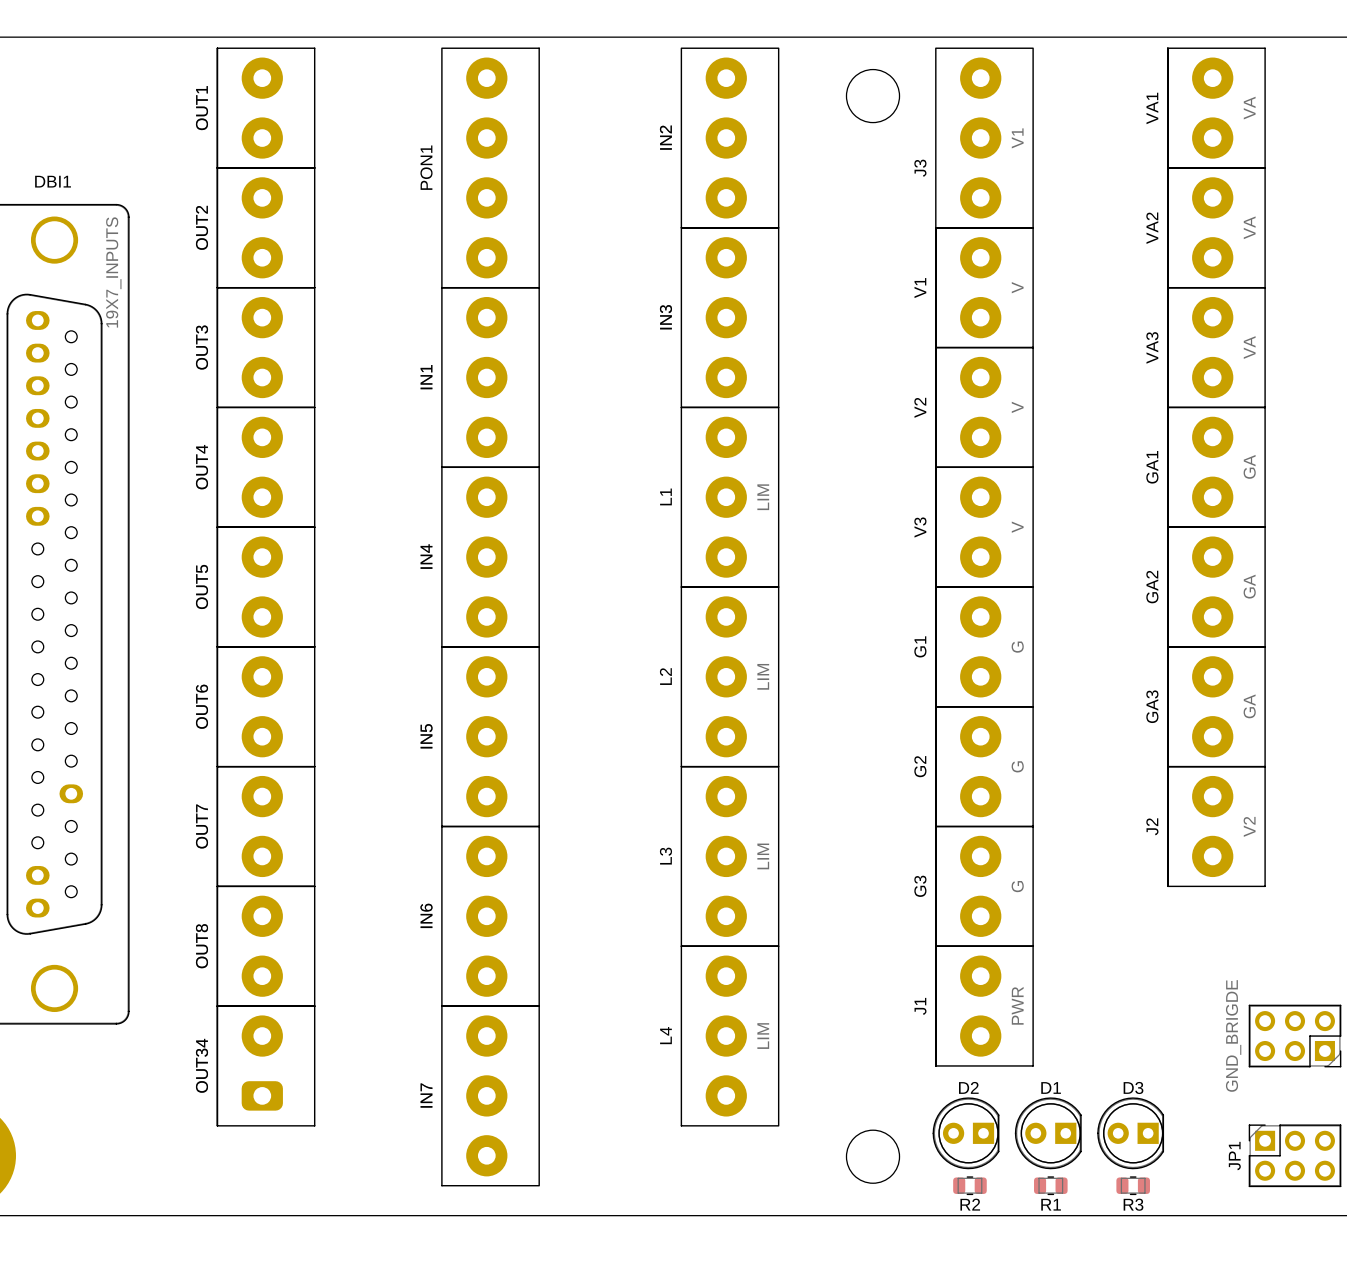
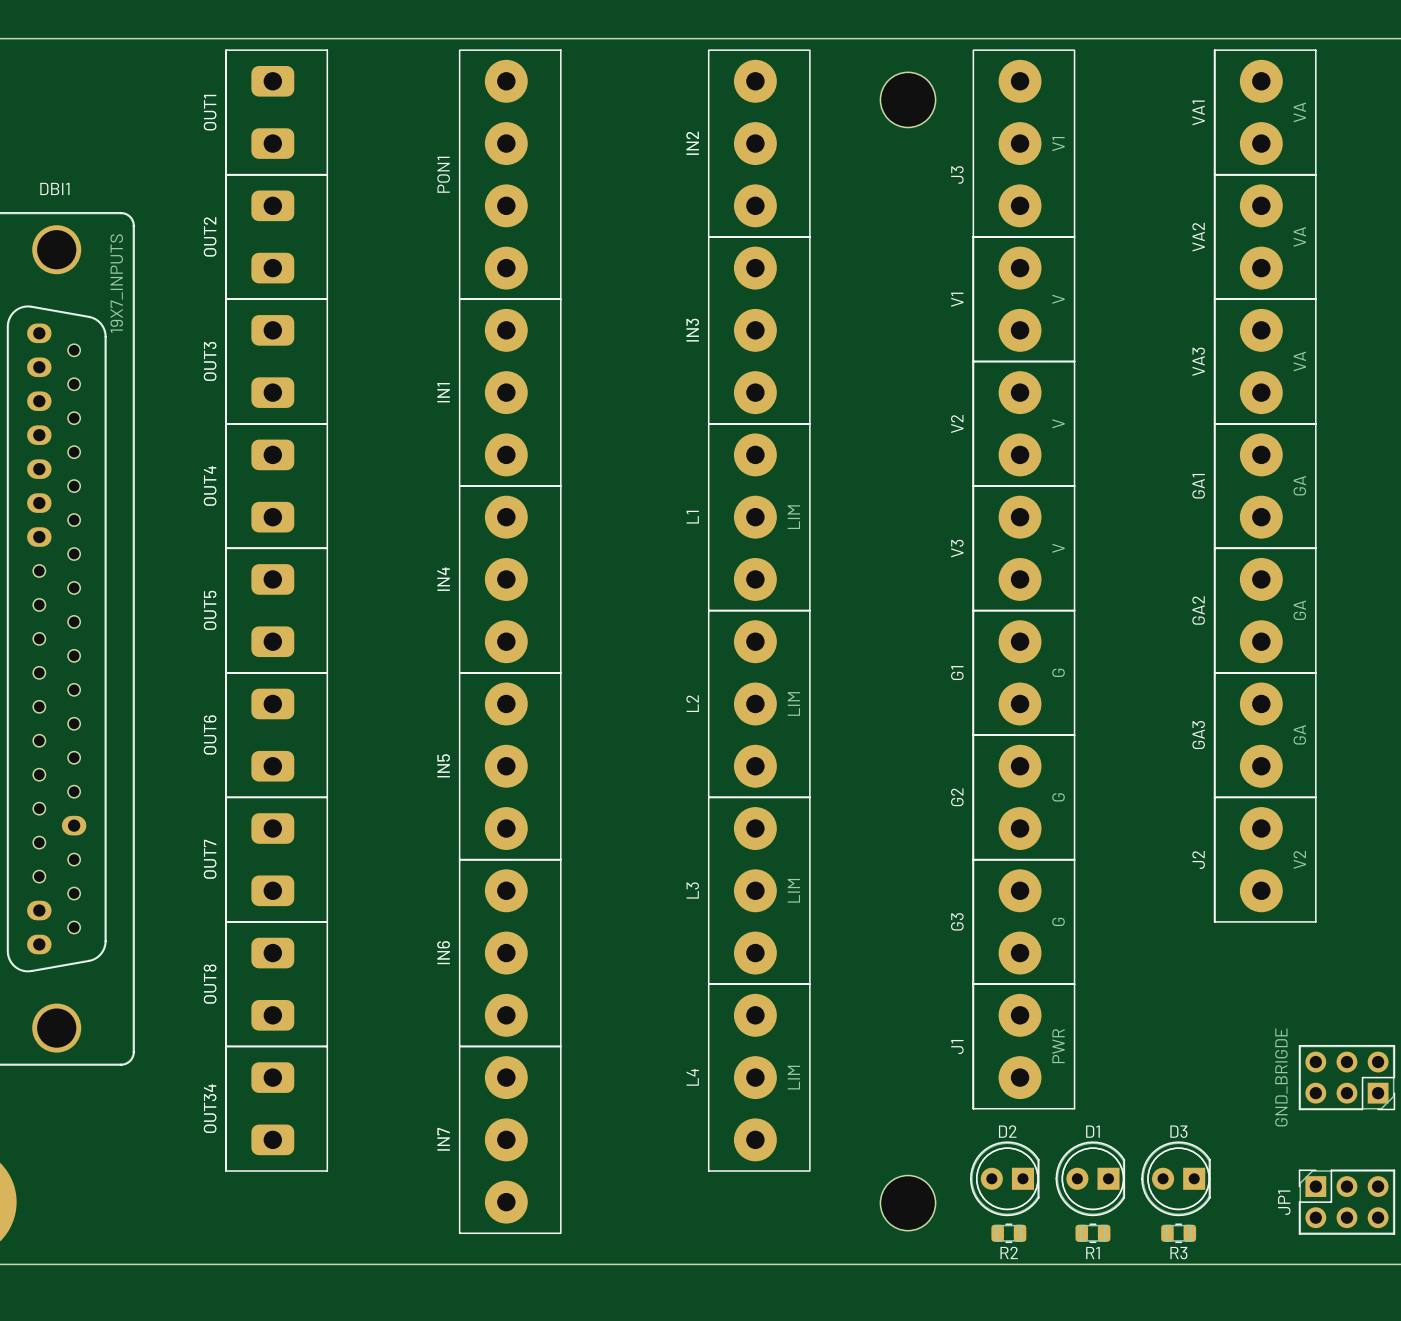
OUT1 footprint: [216, 47, 316, 169] -> [225, 49, 329, 176]
OUT2 footprint: [216, 167, 316, 289] -> [225, 173, 329, 300]
OUT3 footprint: [216, 286, 316, 409] -> [225, 298, 329, 425]
OUT4 footprint: [216, 406, 316, 528] -> [225, 423, 329, 550]
OUT5 footprint: [216, 526, 316, 648] -> [225, 547, 329, 674]
OUT6 footprint: [216, 646, 316, 768] -> [225, 672, 329, 799]
OUT7 footprint: [216, 765, 316, 888] -> [225, 796, 329, 923]
OUT8 footprint: [216, 885, 316, 1007] -> [225, 921, 329, 1048]
OUT34 footprint: [216, 1005, 316, 1127] -> [225, 1045, 329, 1172]

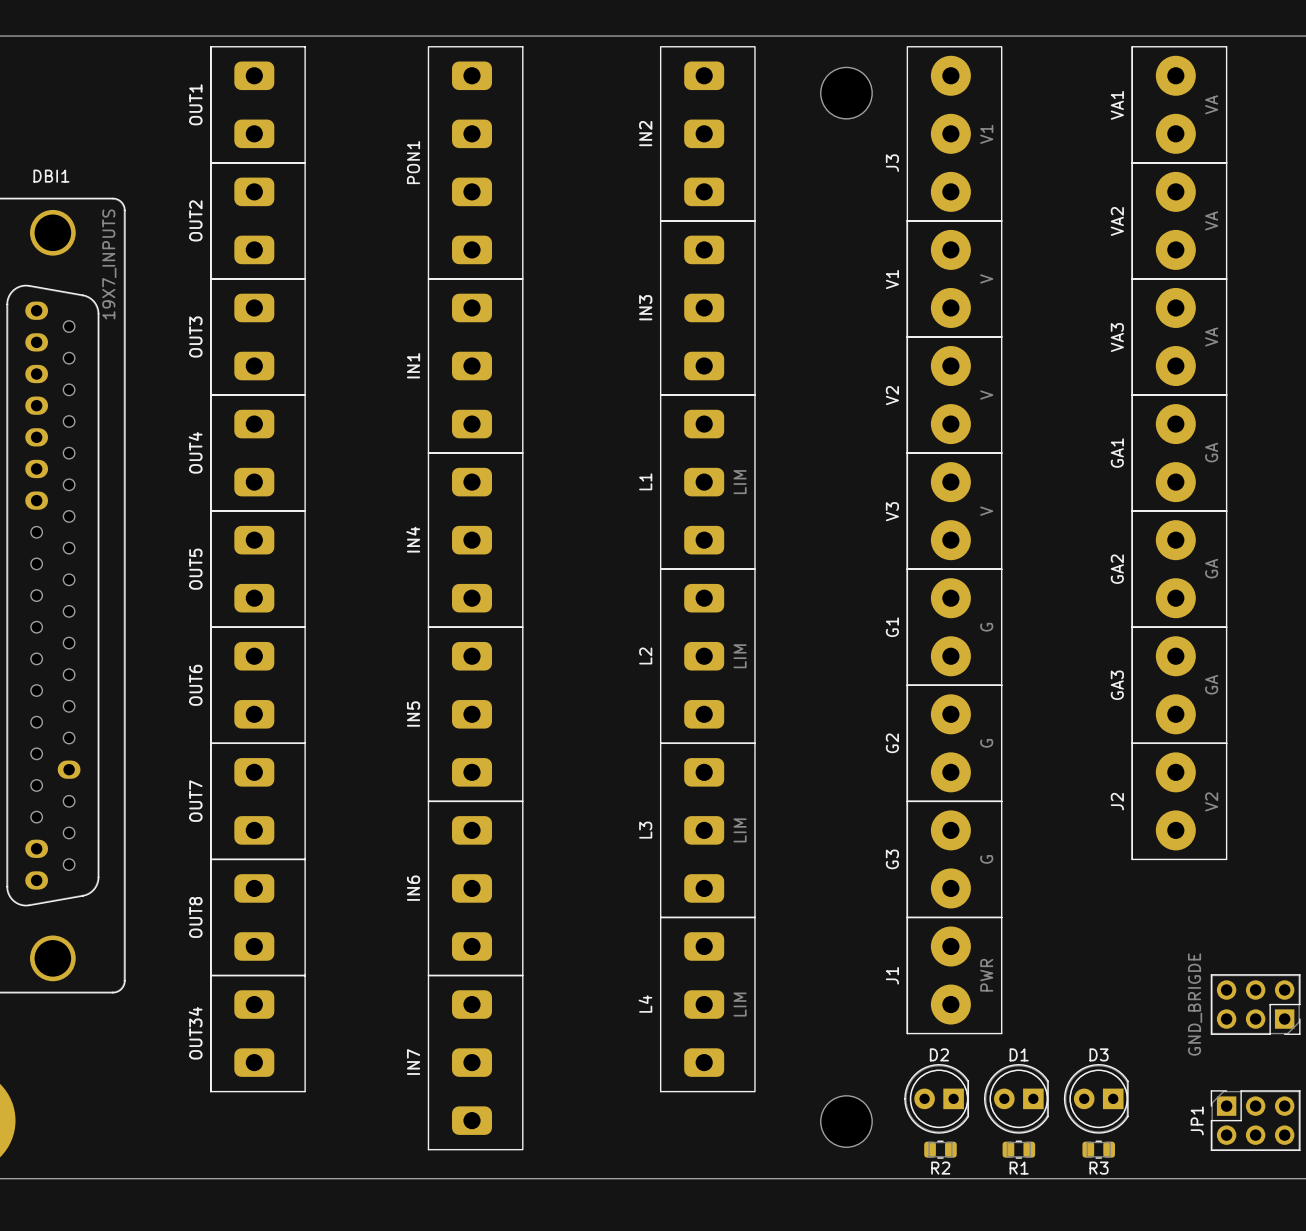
PON1 footprint: [458, 49, 562, 300] -> [427, 46, 524, 280]
IN2 footprint: [707, 49, 811, 238] -> [659, 46, 756, 222]
IN3 footprint: [707, 236, 811, 425] -> [659, 220, 756, 396]
IN1 footprint: [458, 298, 562, 487] -> [427, 278, 524, 454]
L1 footprint: [707, 423, 811, 612] -> [659, 394, 756, 570]
IN4 footprint: [458, 485, 562, 674] -> [427, 452, 524, 628]
L2 footprint: [707, 609, 811, 799] -> [659, 568, 756, 745]
IN5 footprint: [458, 672, 562, 861] -> [427, 626, 524, 803]
L3 footprint: [707, 796, 811, 985] -> [659, 742, 756, 919]
IN6 footprint: [458, 858, 562, 1048] -> [427, 800, 524, 977]
L4 footprint: [707, 983, 811, 1172] -> [659, 916, 756, 1093]
IN7 footprint: [458, 1045, 562, 1235] -> [427, 974, 524, 1151]

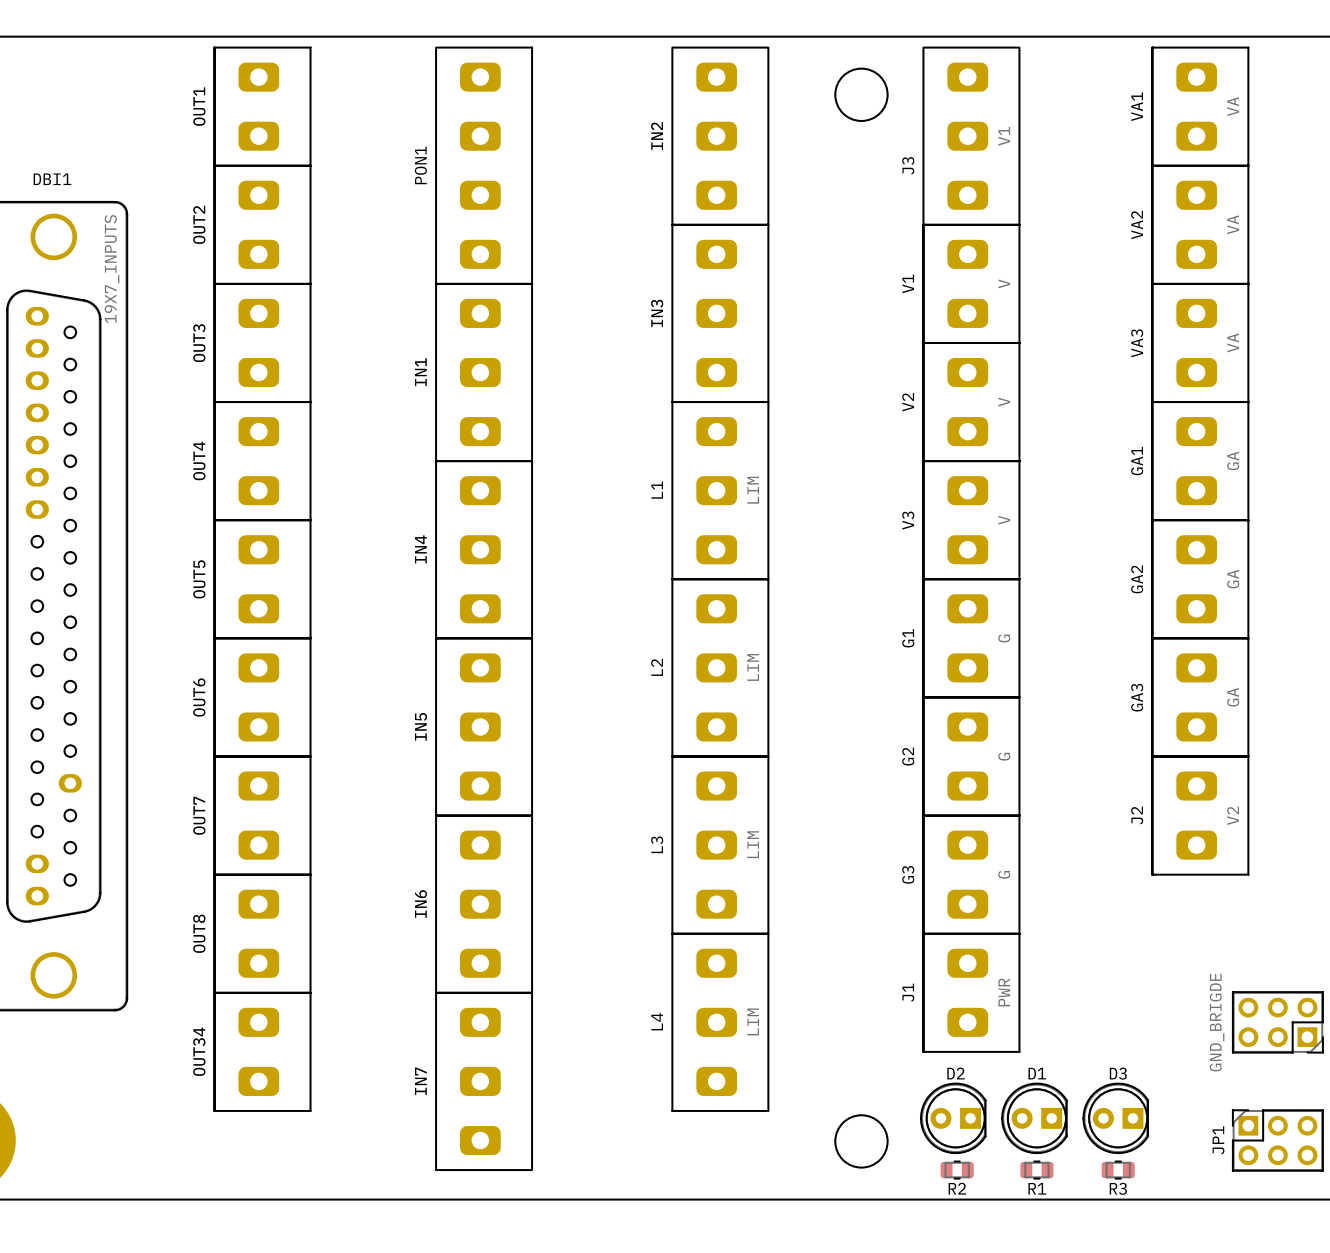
J3 footprint: [906, 46, 1003, 222] -> [922, 46, 1021, 226]
VA1 footprint: [1131, 46, 1228, 164] -> [1151, 46, 1250, 167]
VA2 footprint: [1131, 162, 1228, 280] -> [1151, 165, 1250, 285]
V1 footprint: [906, 220, 1003, 338] -> [922, 224, 1021, 344]
VA3 footprint: [1131, 278, 1228, 396] -> [1151, 283, 1250, 403]
V2 footprint: [906, 336, 1003, 454] -> [922, 342, 1021, 462]
GA1 footprint: [1131, 394, 1228, 512] -> [1151, 401, 1250, 521]
V3 footprint: [906, 452, 1003, 570] -> [922, 460, 1021, 580]
GA2 footprint: [1131, 510, 1228, 628] -> [1151, 519, 1250, 640]
G1 footprint: [906, 568, 1003, 686] -> [922, 578, 1021, 699]
GA3 footprint: [1131, 626, 1228, 745] -> [1151, 637, 1250, 758]
G2 footprint: [906, 684, 1003, 803] -> [922, 696, 1021, 817]
J2 footprint: [1131, 742, 1228, 861] -> [1151, 755, 1250, 876]
G3 footprint: [906, 800, 1003, 919] -> [922, 814, 1021, 935]
J1 footprint: [906, 916, 1003, 1035] -> [922, 933, 1021, 1053]

